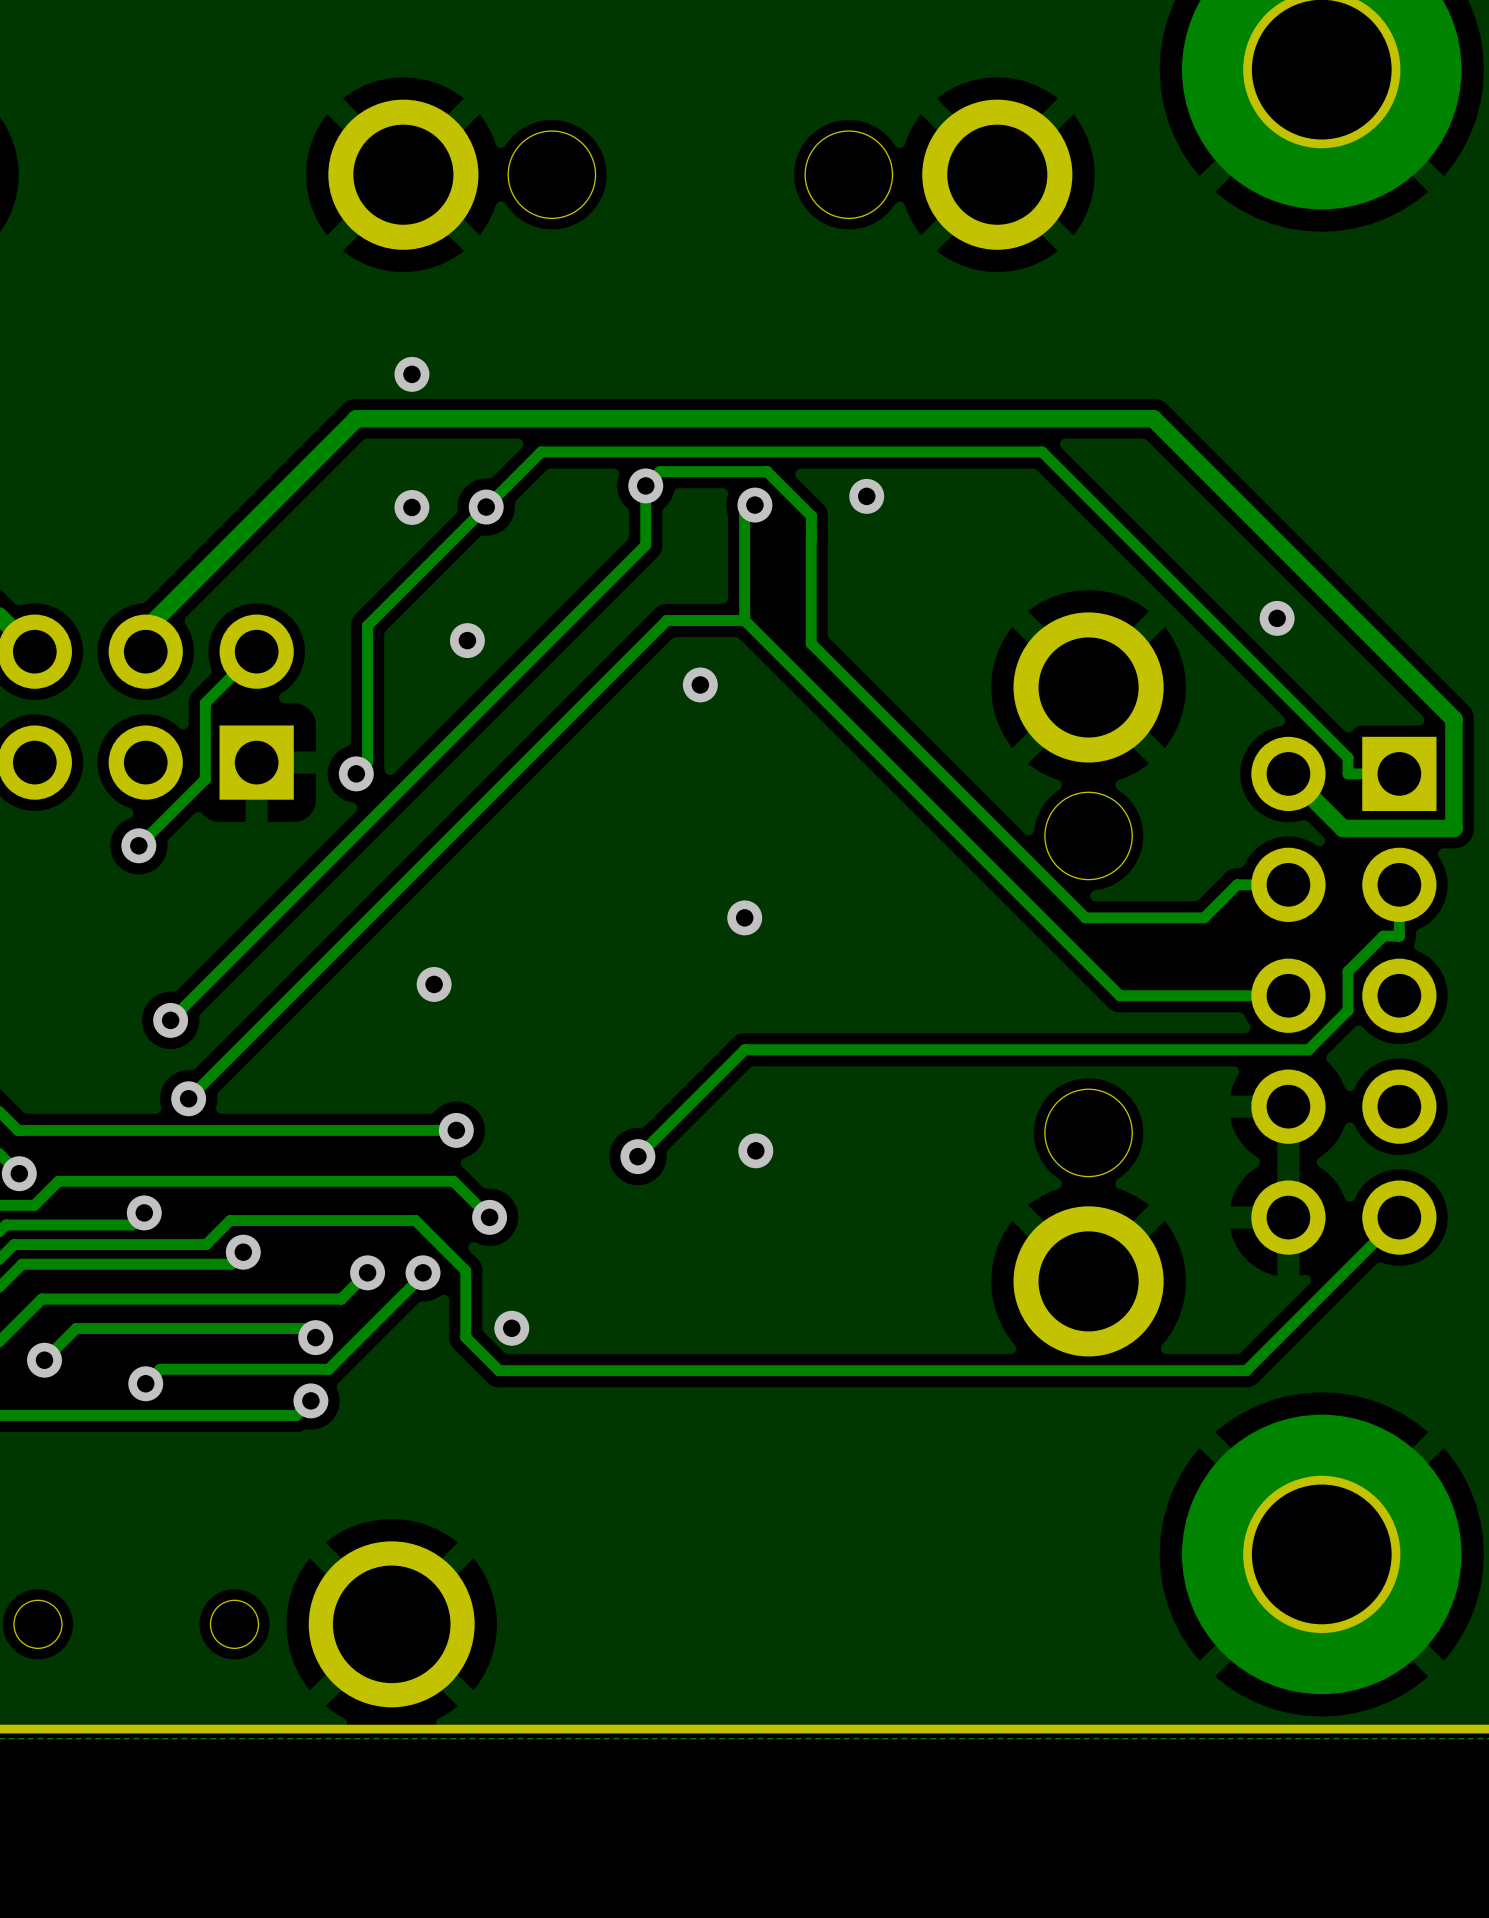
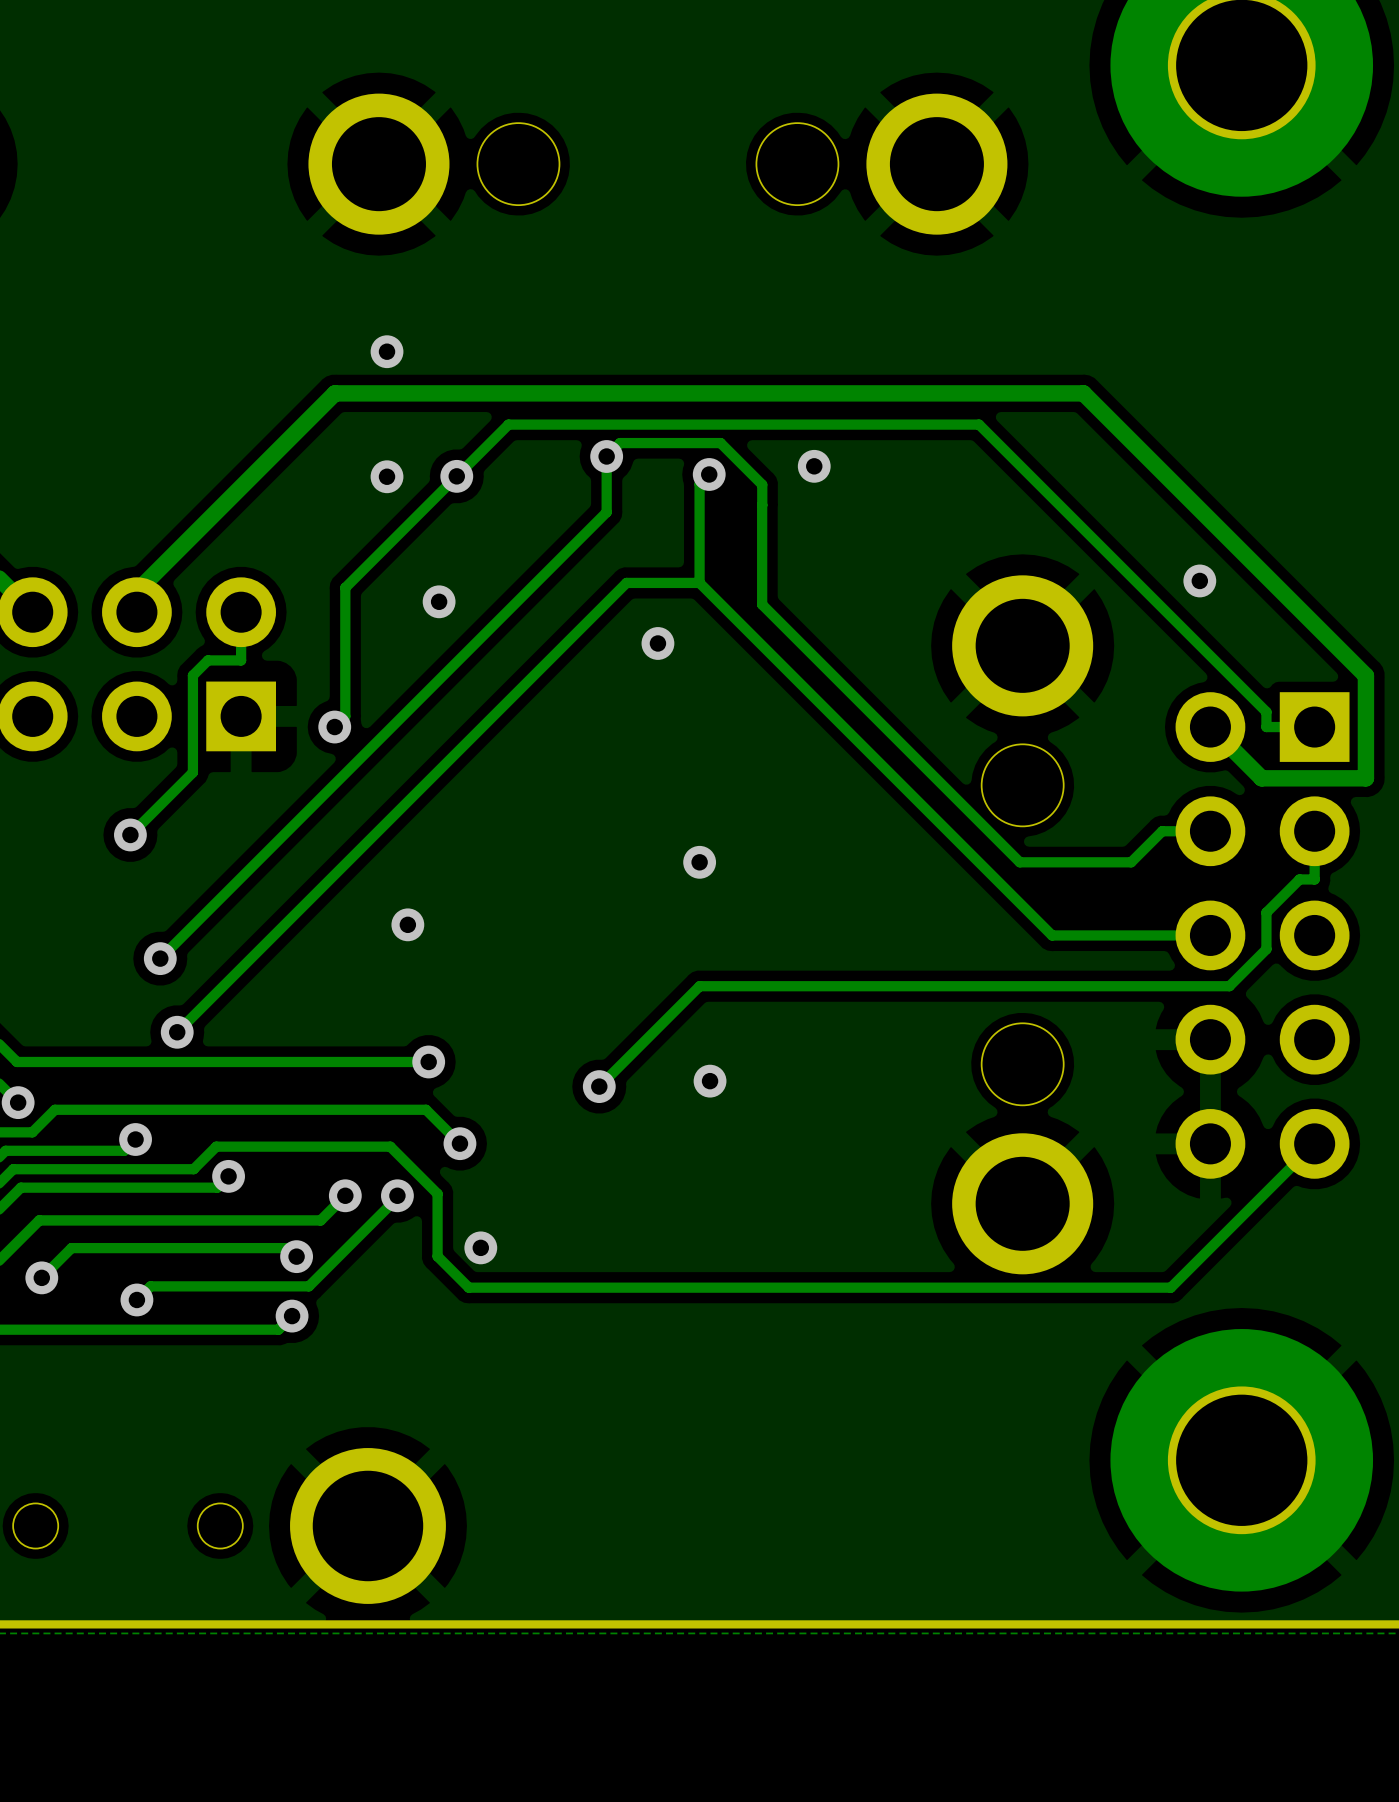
track: (256, 651) (205, 702) (205, 719) -> (241, 612) (241, 660) (207, 660) (192, 675)
track: (205, 779) (138, 845) -> (192, 732) (192, 772) (130, 834)
via position: (138, 845) -> (130, 834)

